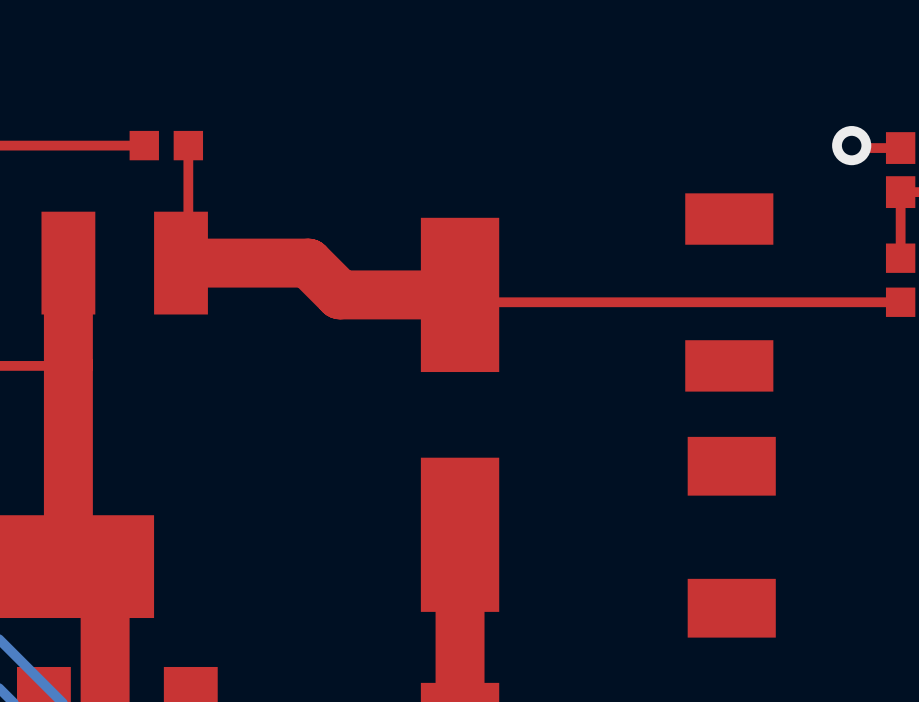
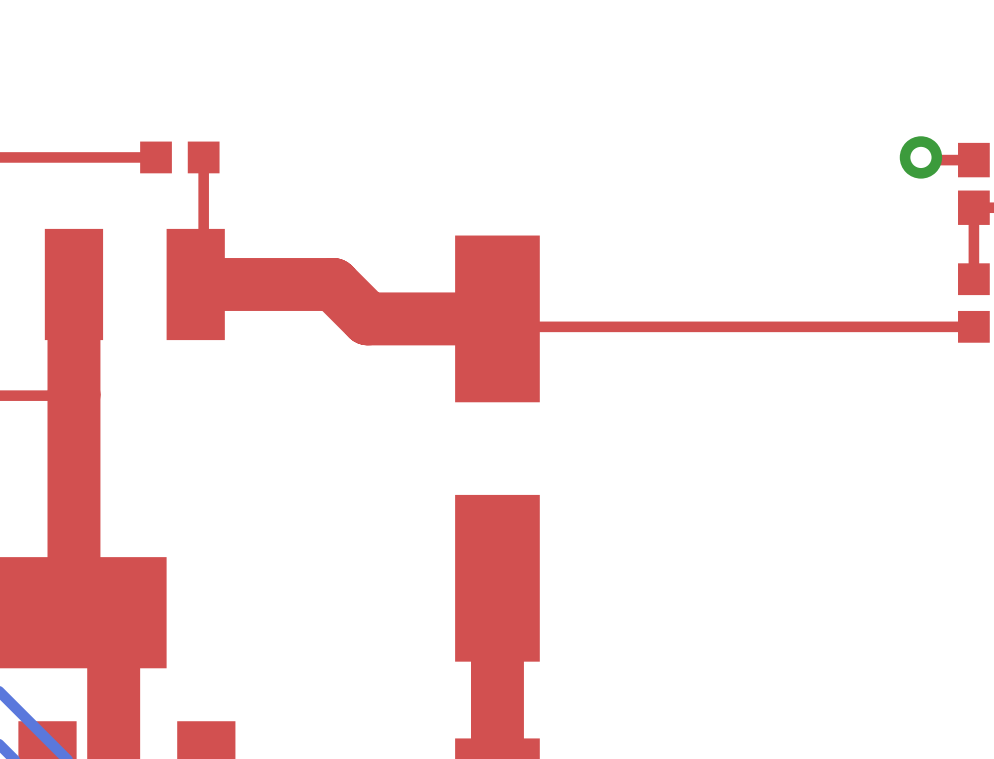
part: (729, 292) -> none
part: (731, 537) -> none

